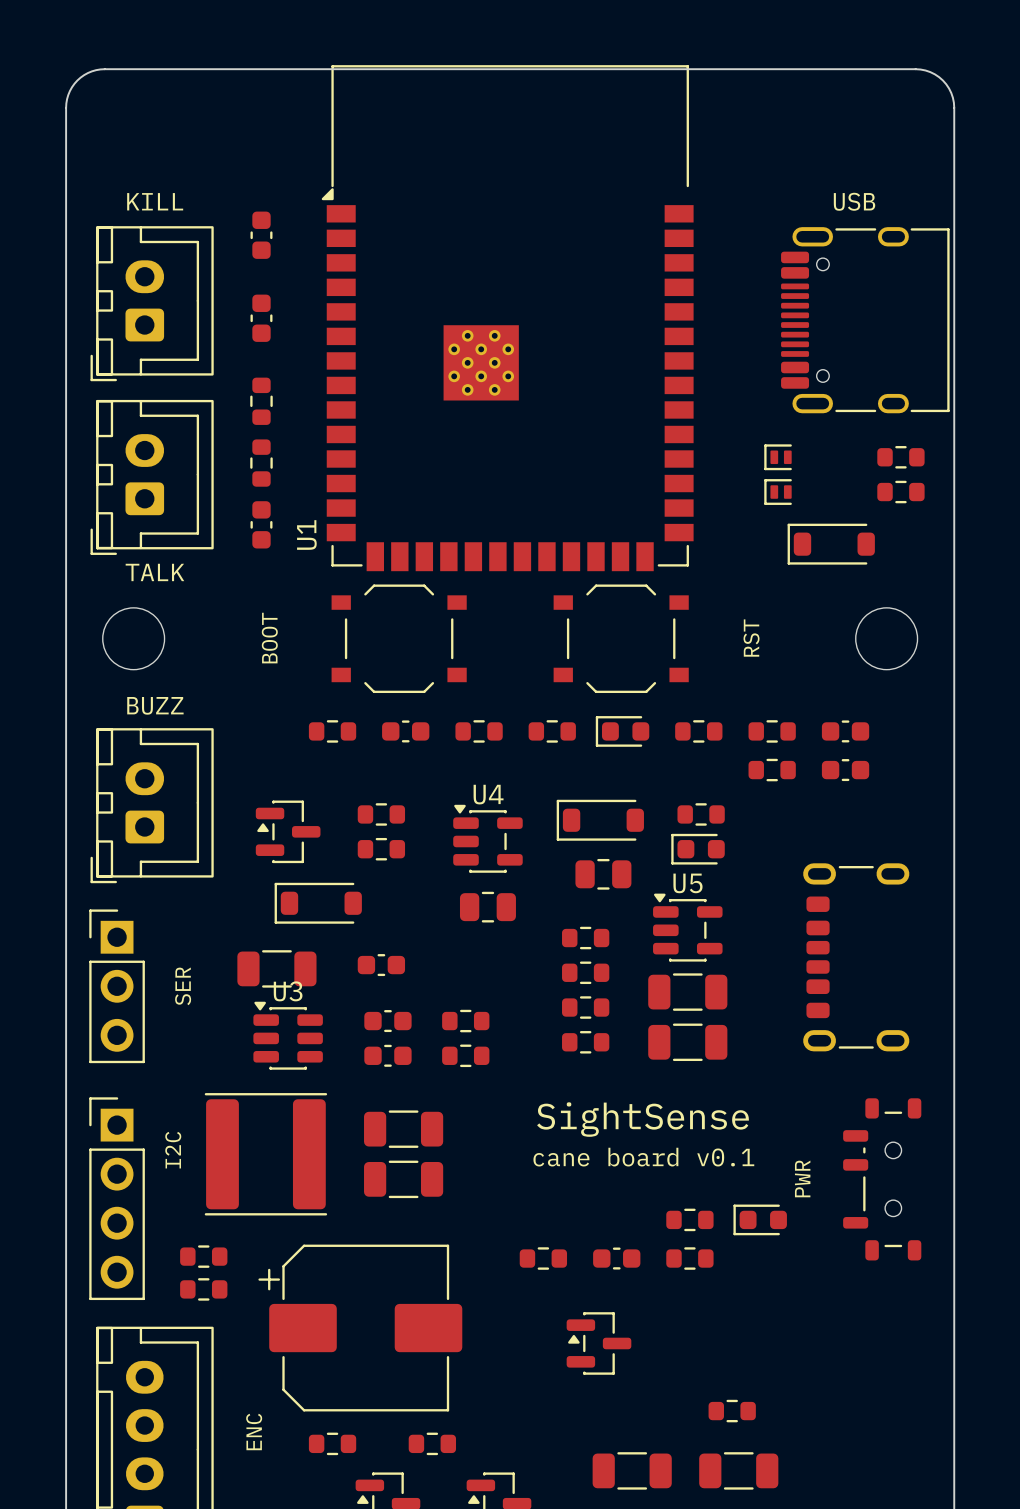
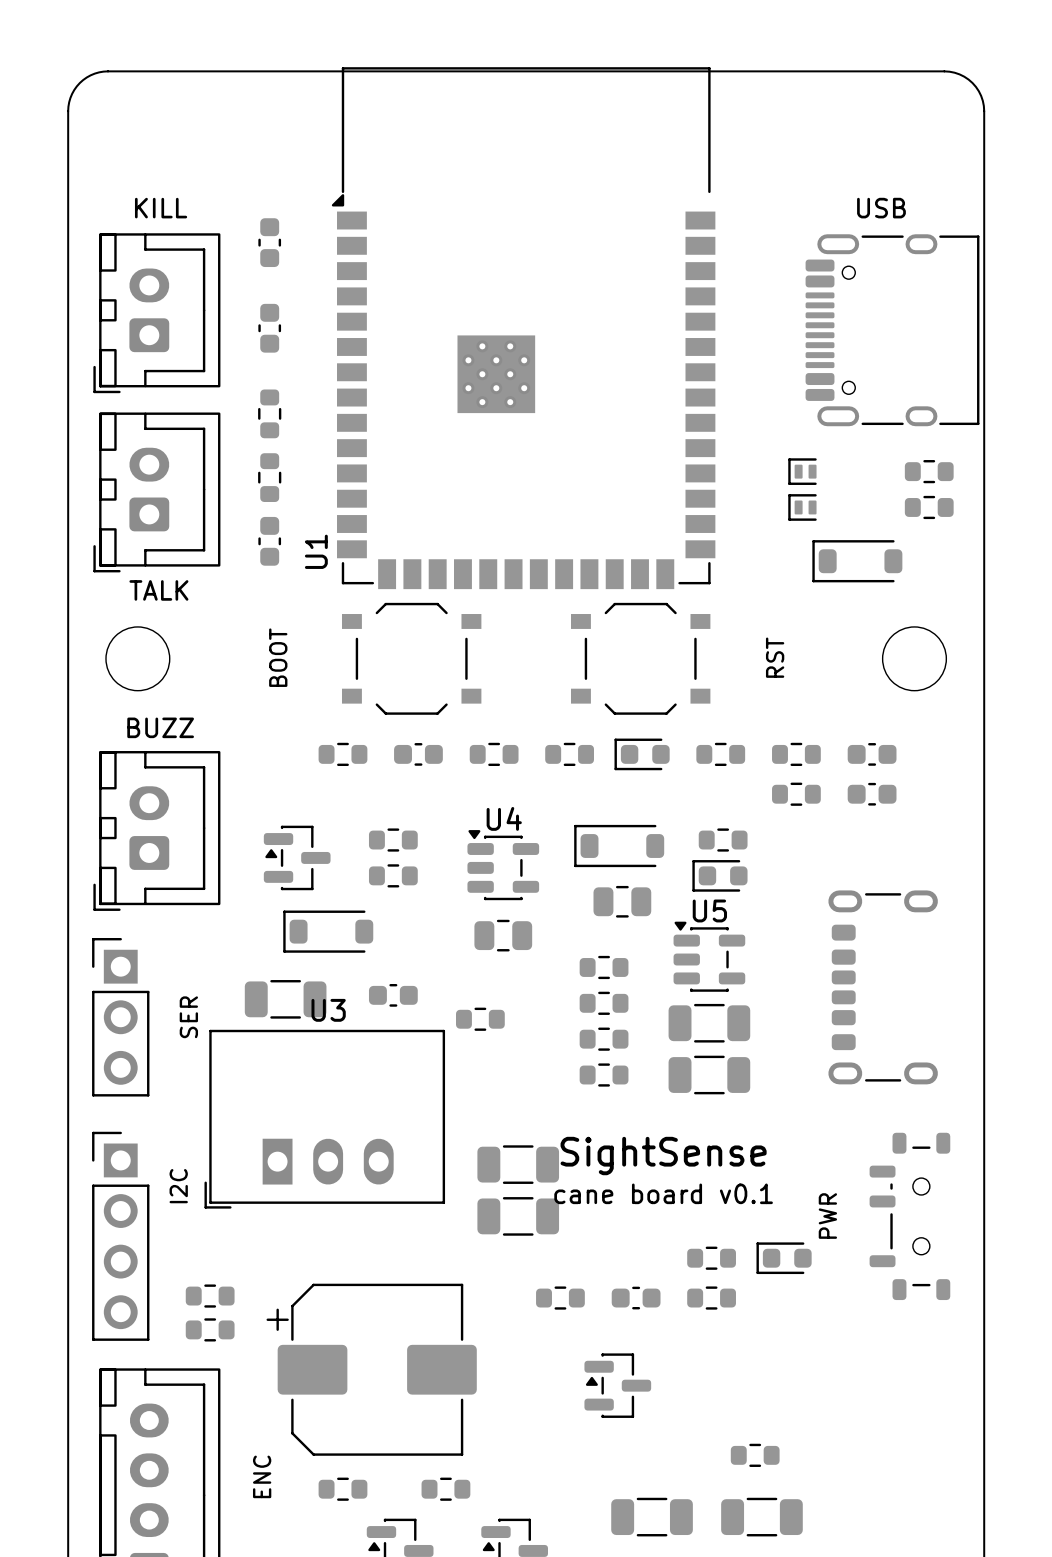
U3 name position: U3 (288, 991) -> U3 (328, 1010)
U3 footprint: [253, 1001, 323, 1070] -> [204, 1029, 446, 1209]
part: (387, 1021) -> none
part position: (465, 1021) -> (480, 1019)
part: (387, 1055) -> none
part: (465, 1055) -> none
part: (403, 1129) -> none
part: none -> (518, 1164)
part: (265, 1154) -> none
part: (403, 1179) -> none
part: none -> (518, 1216)

